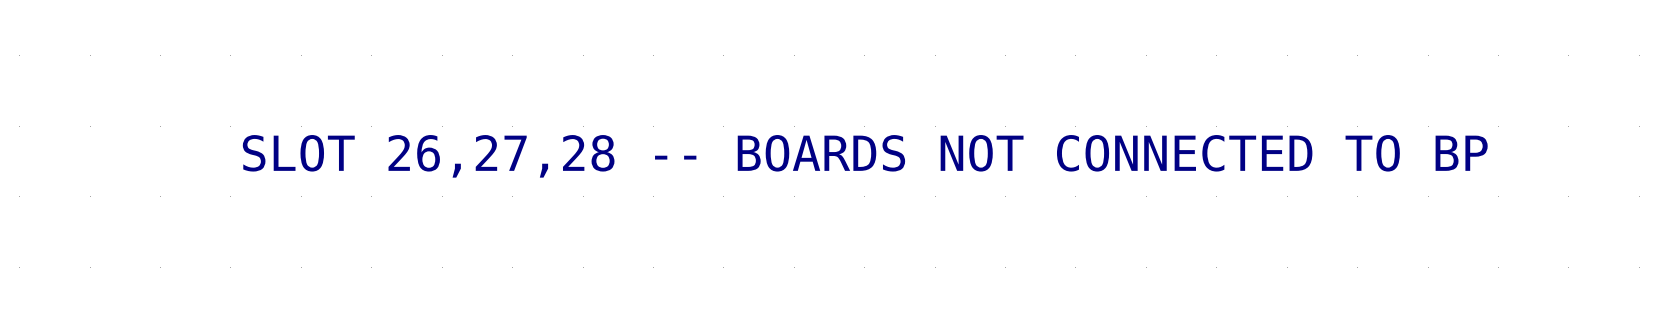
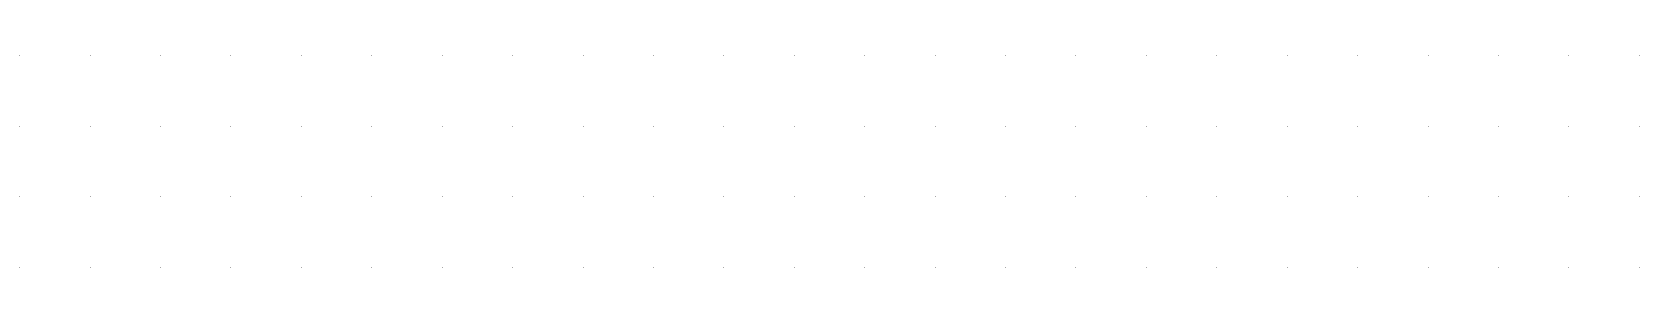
text: SLOT 26,27,28 -- BOARDS NOT CONNECTED TO BP (865, 156) -> none

